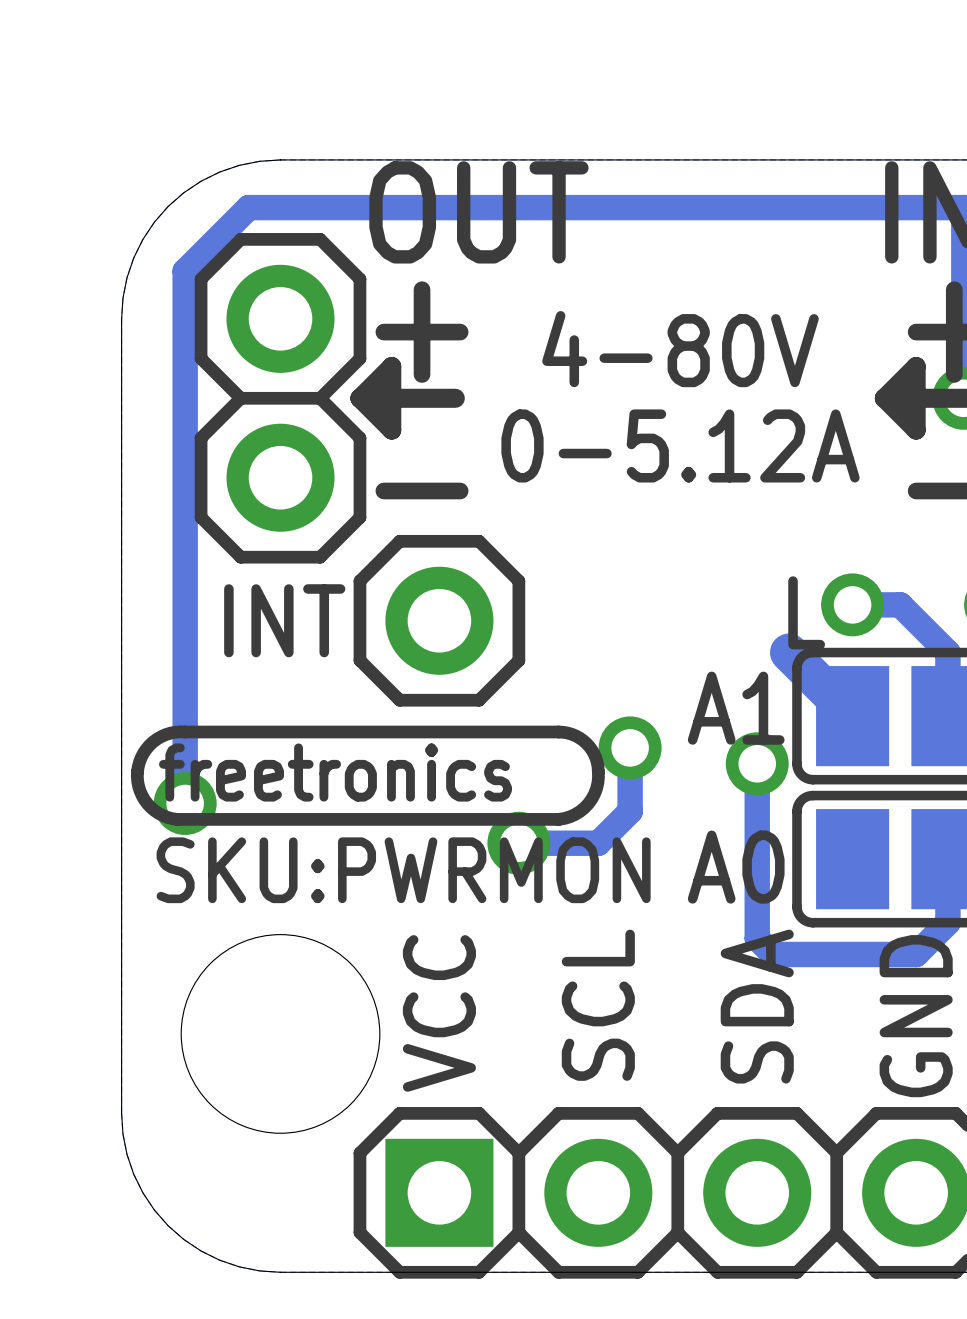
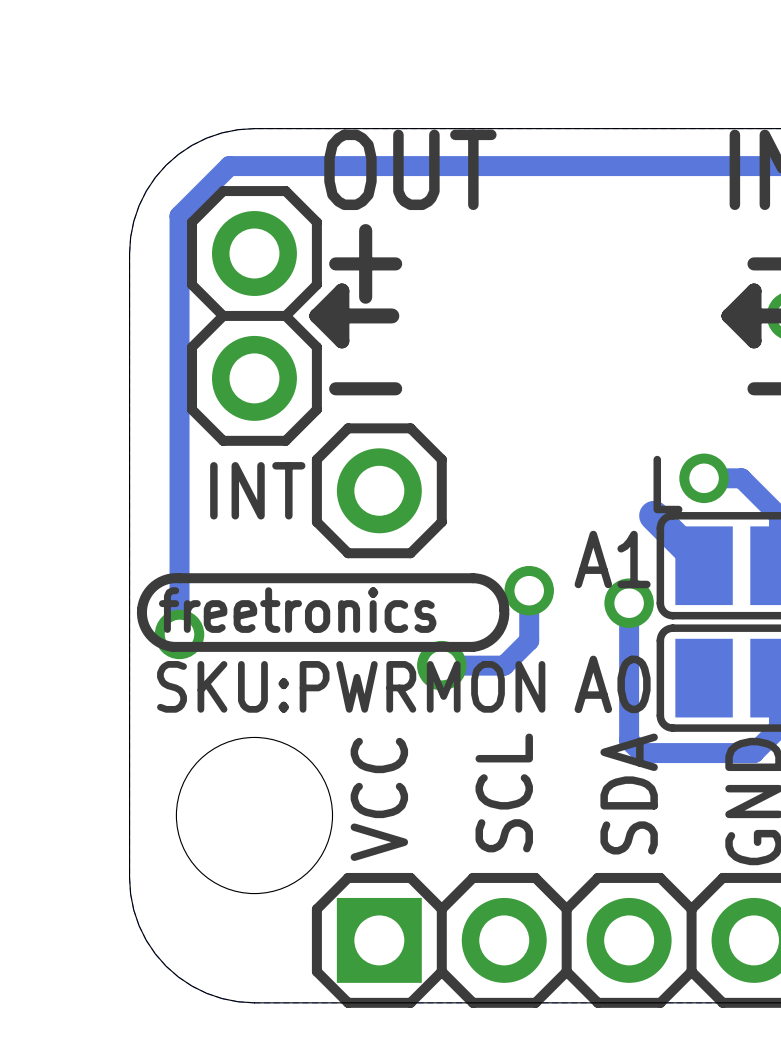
text: 4-80V (680, 349) -> none
text: 0-5.12A (680, 445) -> none

